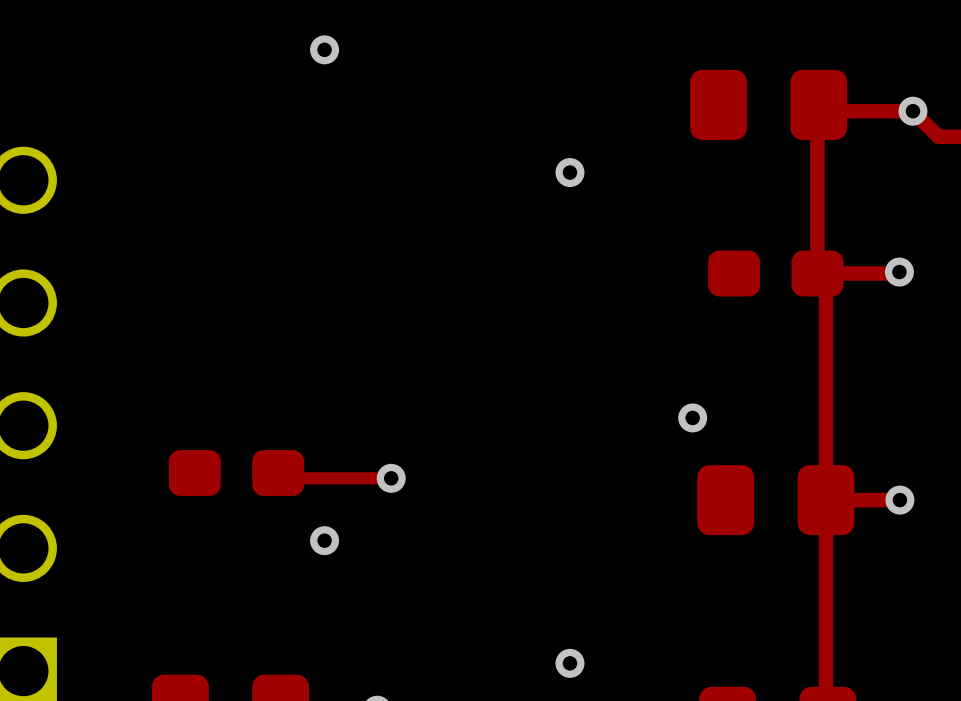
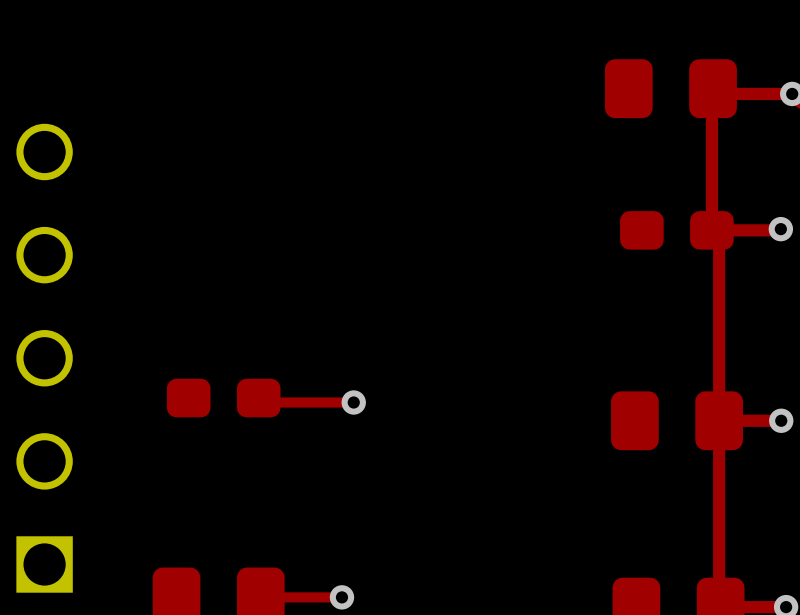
via: (324, 49) -> none
via: (569, 172) -> none
via: (692, 417) -> none
via: (324, 540) -> none
via: (569, 663) -> none

